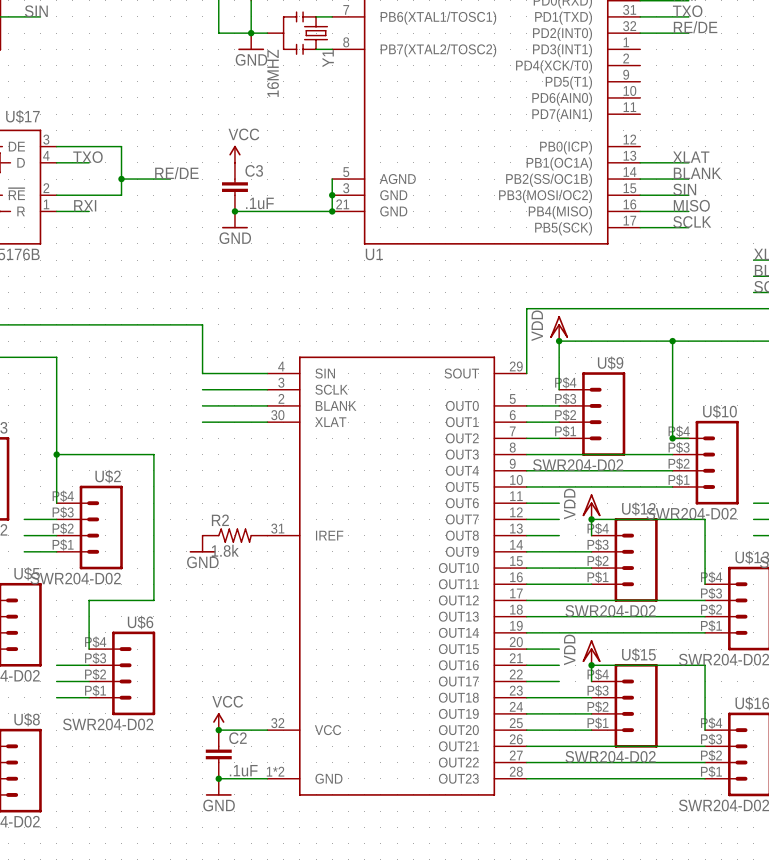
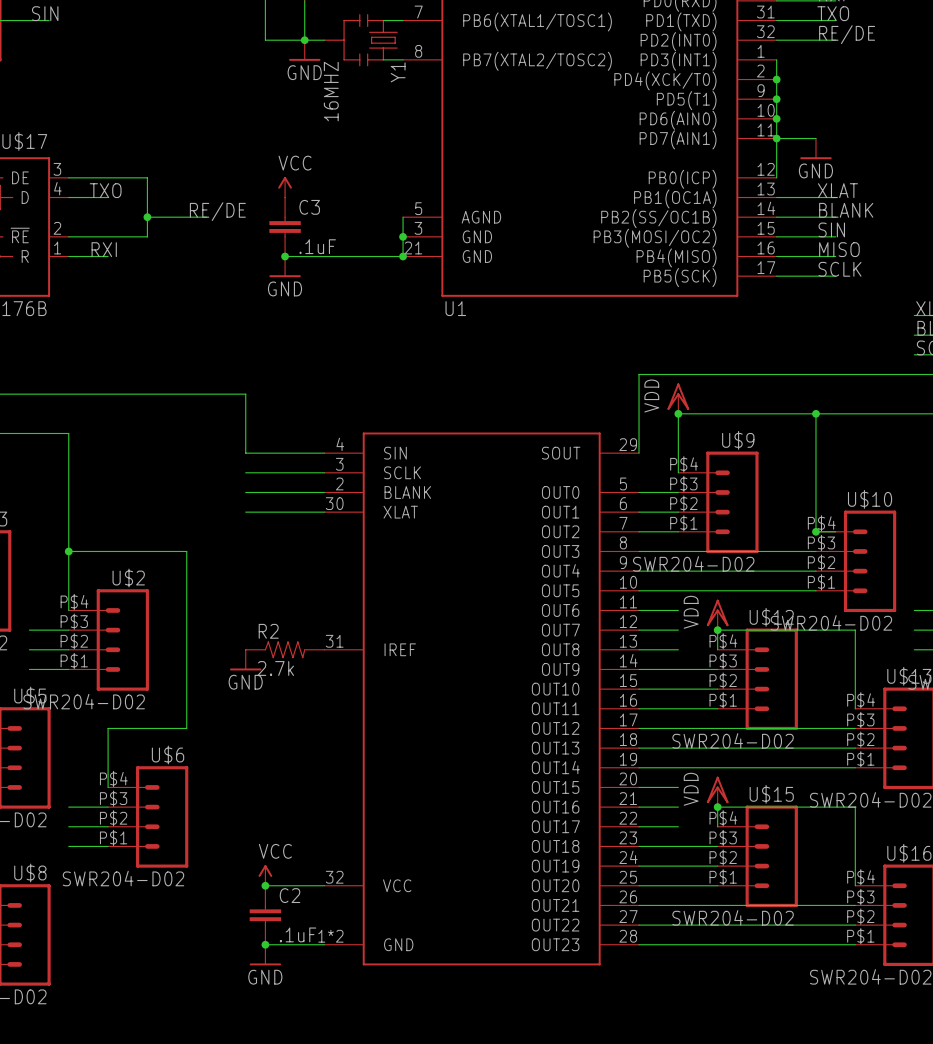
wire: none -> (776, 59) (776, 177)
junction: none -> (776, 79)
junction: none -> (776, 99)
junction: none -> (776, 118)
wire: none -> (776, 138) (815, 138)
junction: none -> (776, 138)
power symbol: none -> GND (815, 148)
R2 value: 1.8k (225, 550) -> 2.7k (275, 668)

